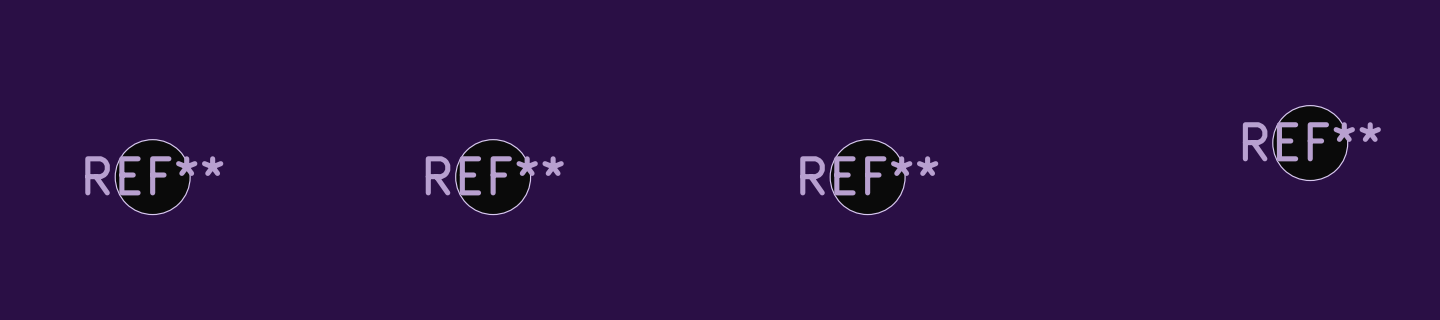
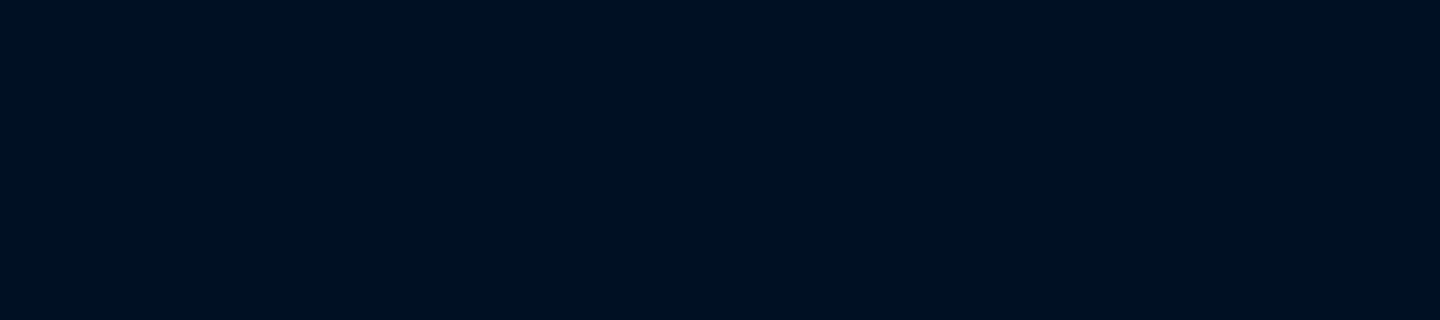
REF**: (1310, 143) -> none
REF**: (152, 177) -> none
REF**: (493, 177) -> none
REF**: (867, 177) -> none

